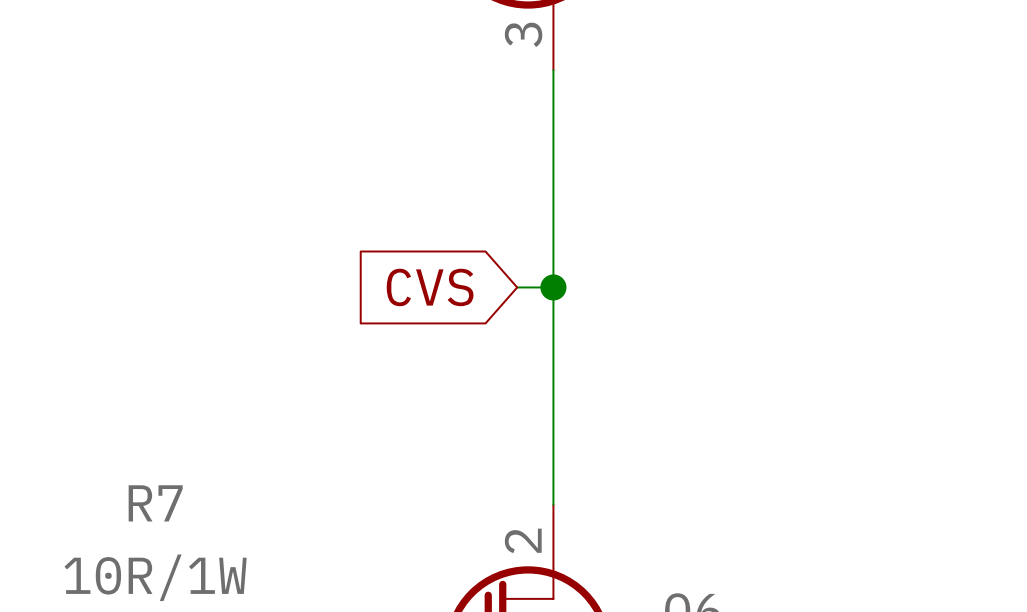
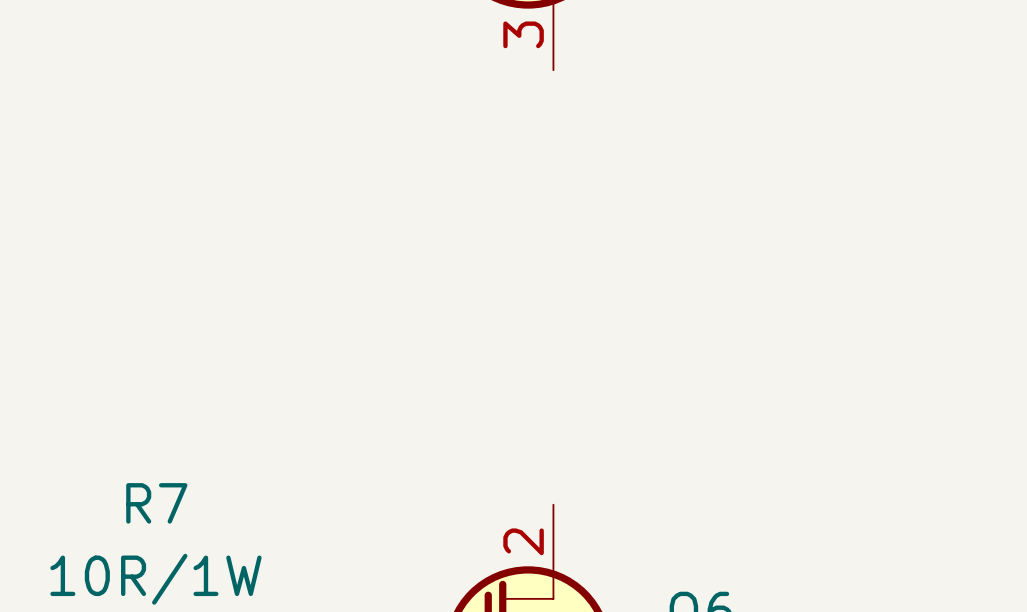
wire: (553, 70) (553, 504) -> none
global label: CVS (430, 287) -> none
wire: (517, 287) (553, 287) -> none
junction: (553, 287) -> none

